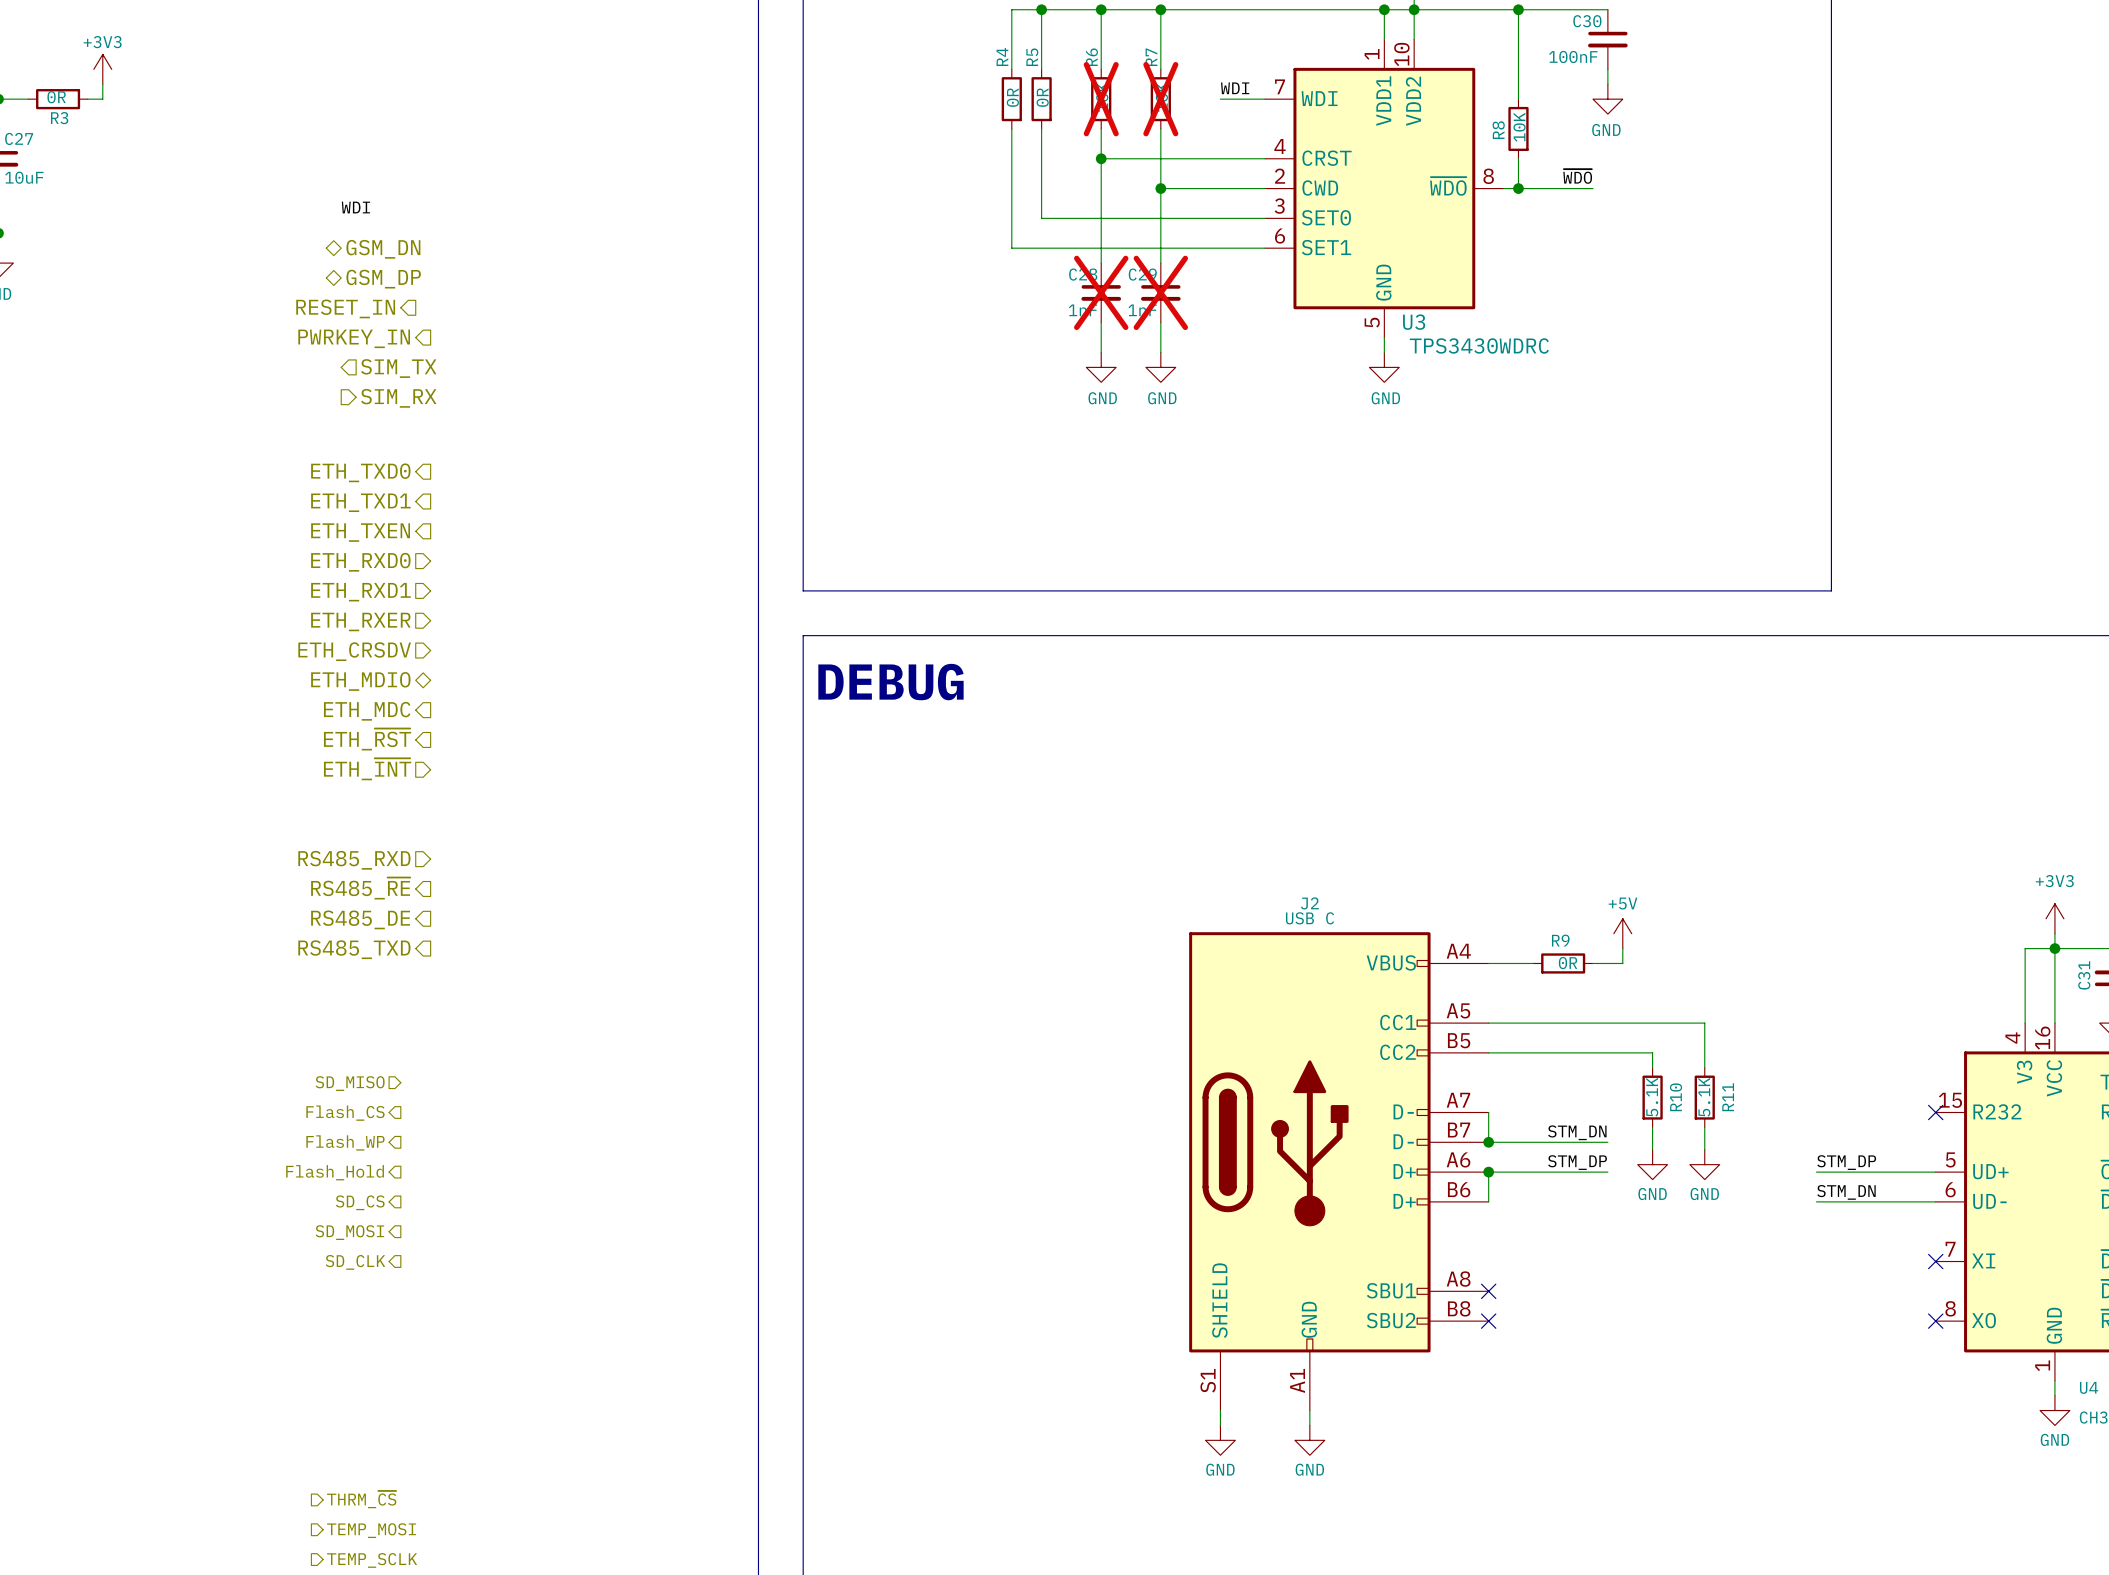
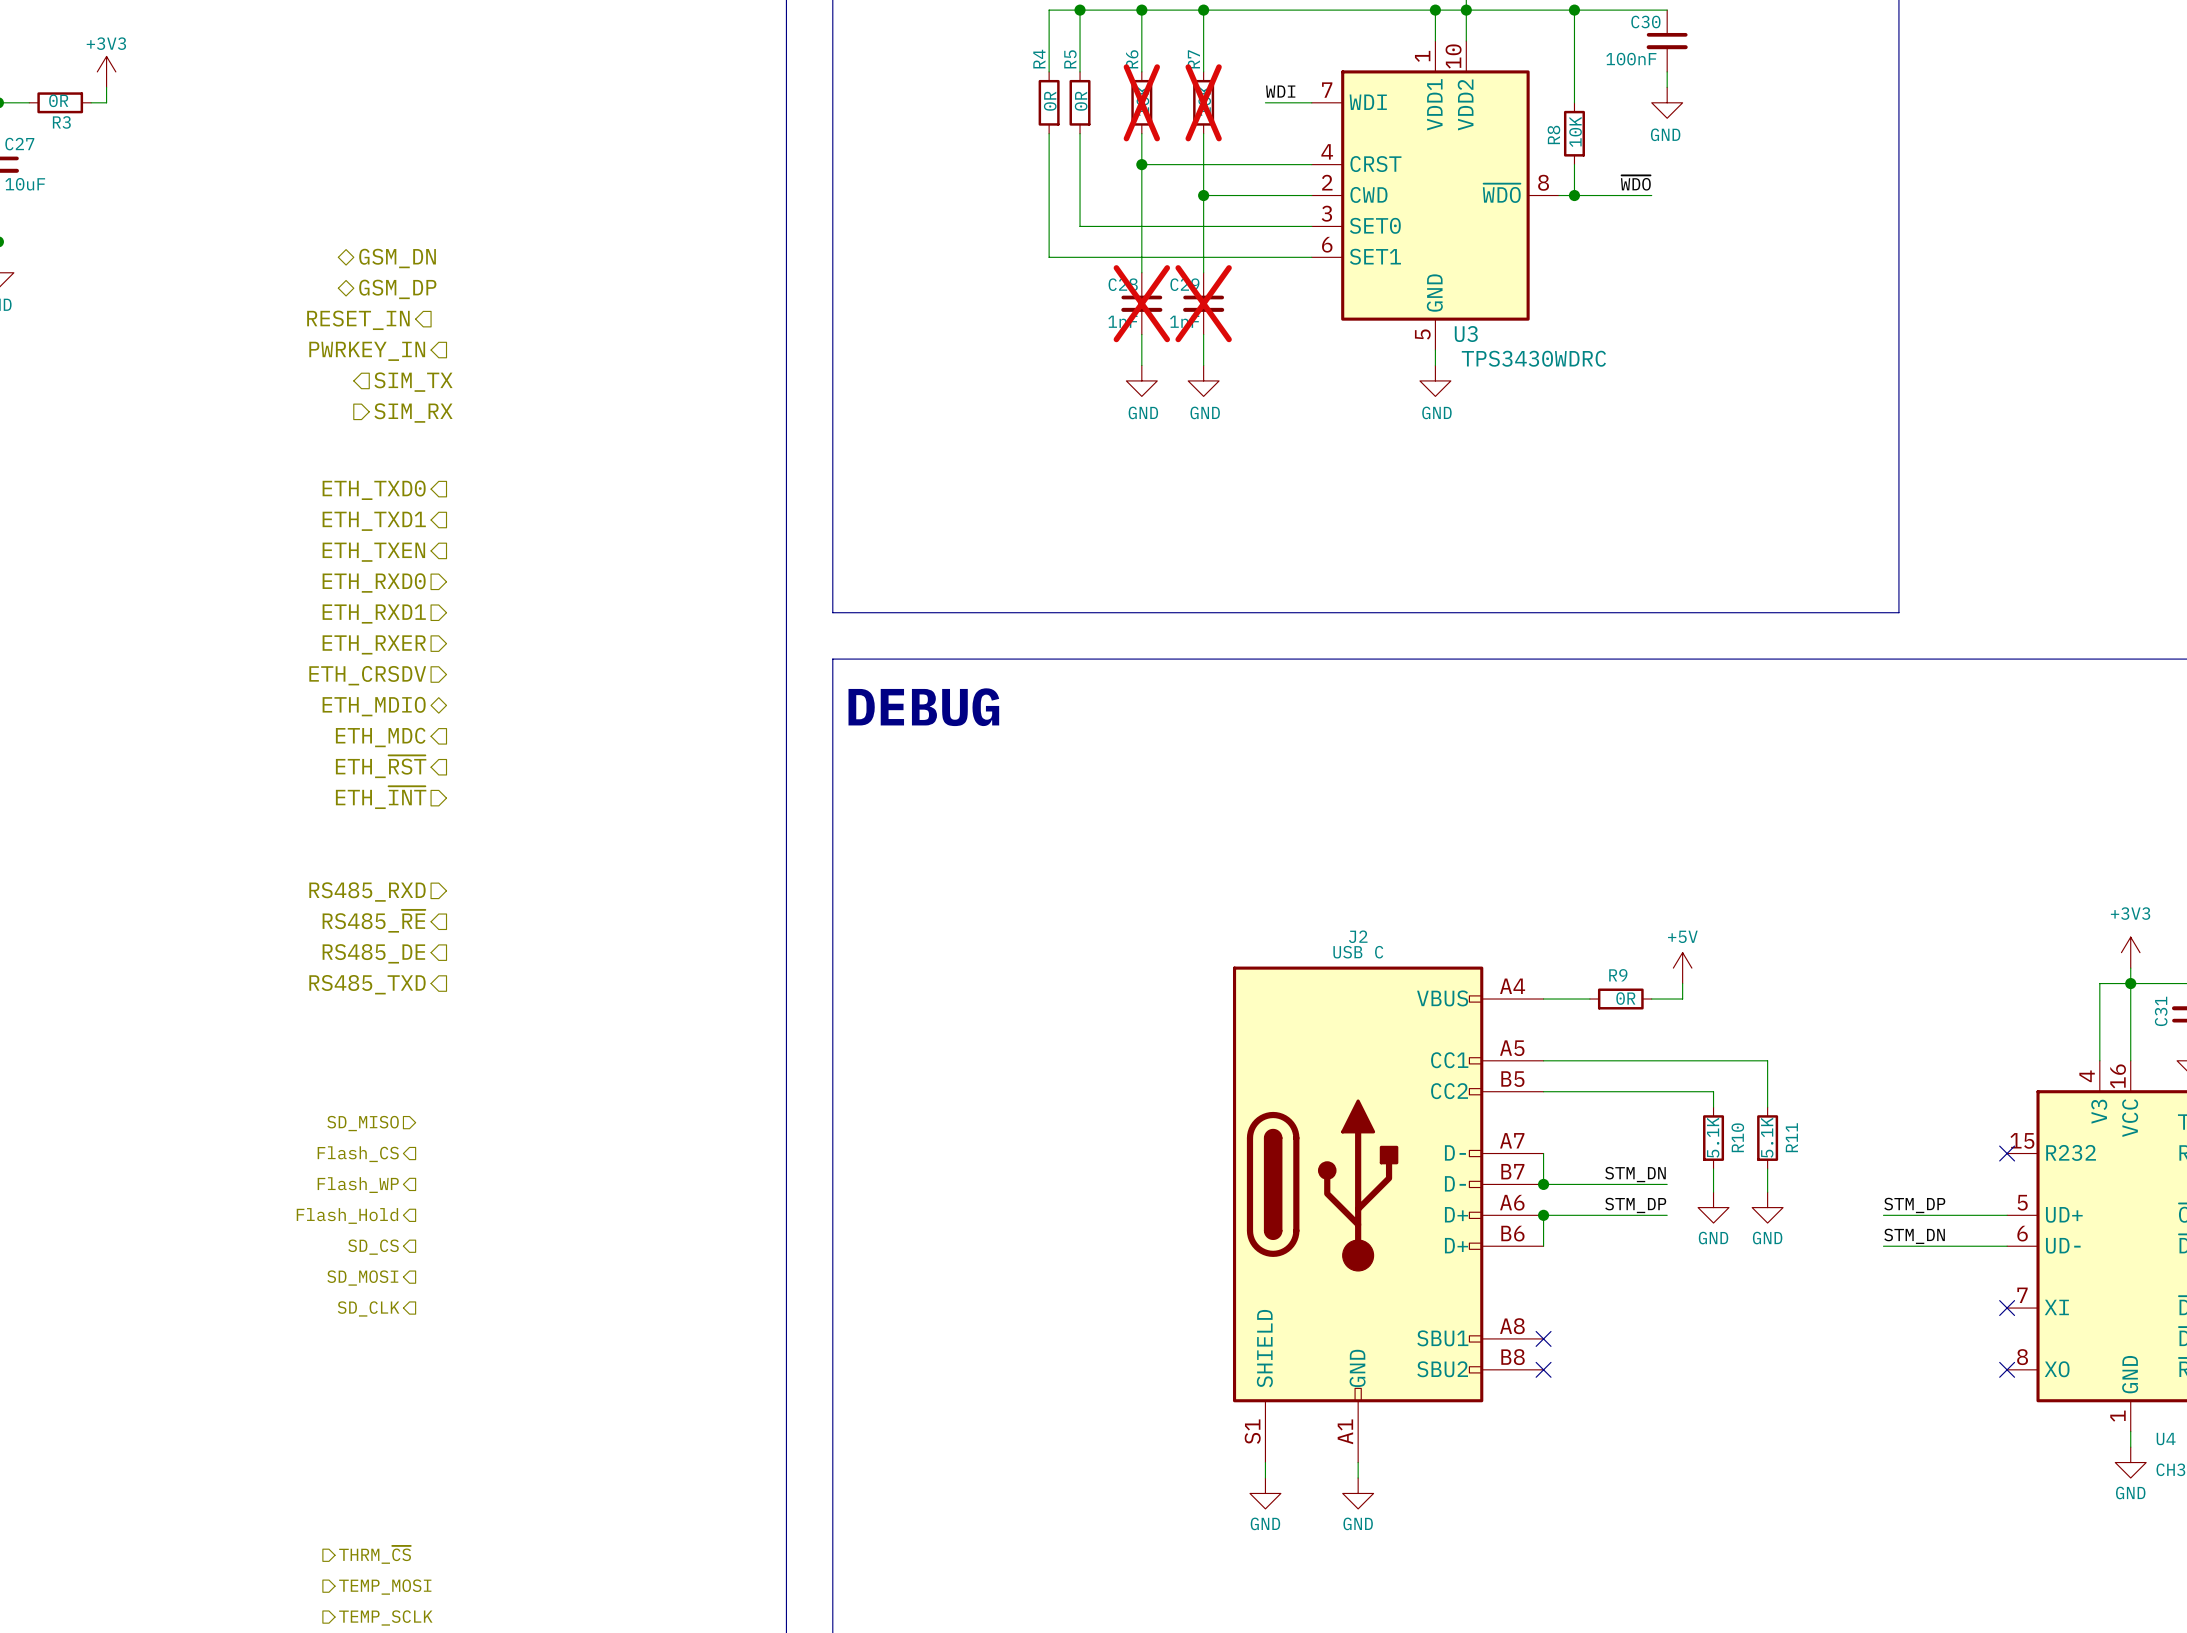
label: WDI (355, 207) -> none

